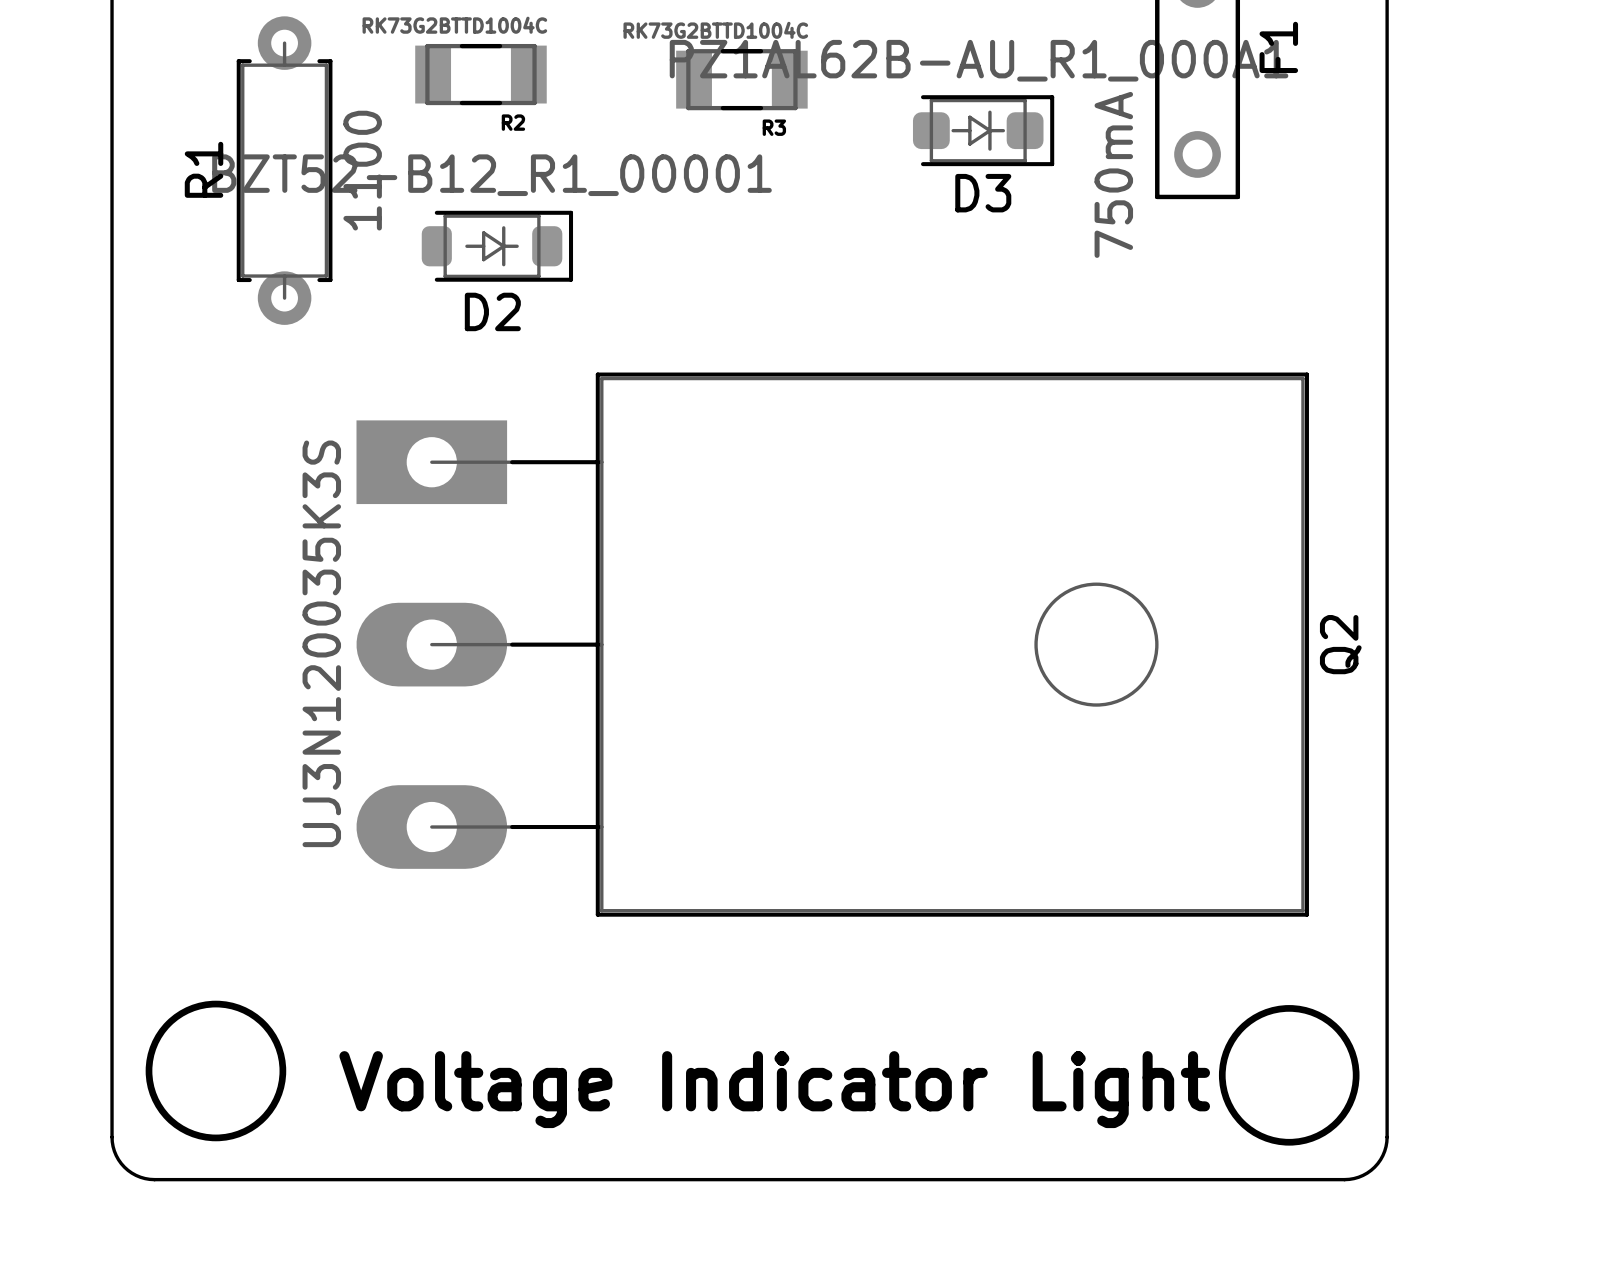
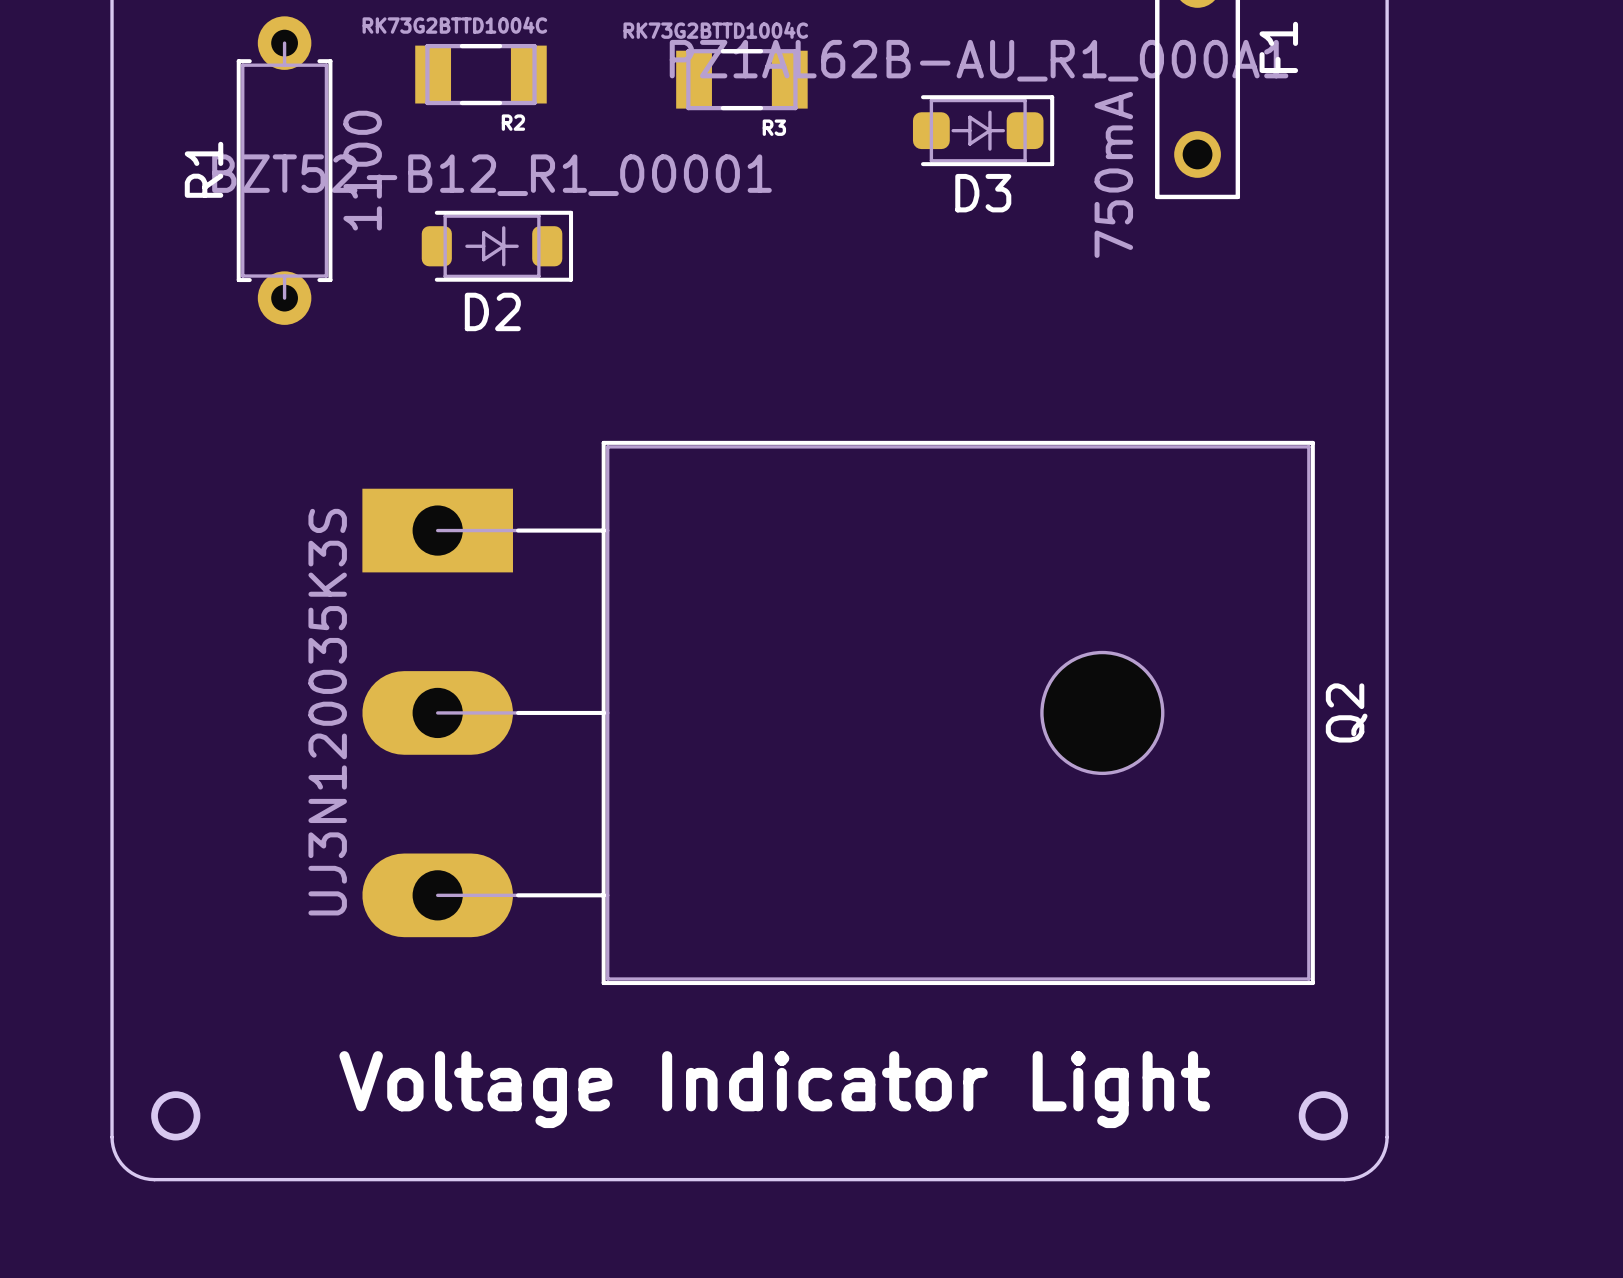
Q2 position: (832, 644) -> (838, 712)
round board edge: [145, 1000, 287, 1142] -> none
round board edge: [1218, 1005, 1360, 1146] -> none
round board edge: none -> [151, 1091, 201, 1141]
round board edge: none -> [1298, 1091, 1348, 1141]

